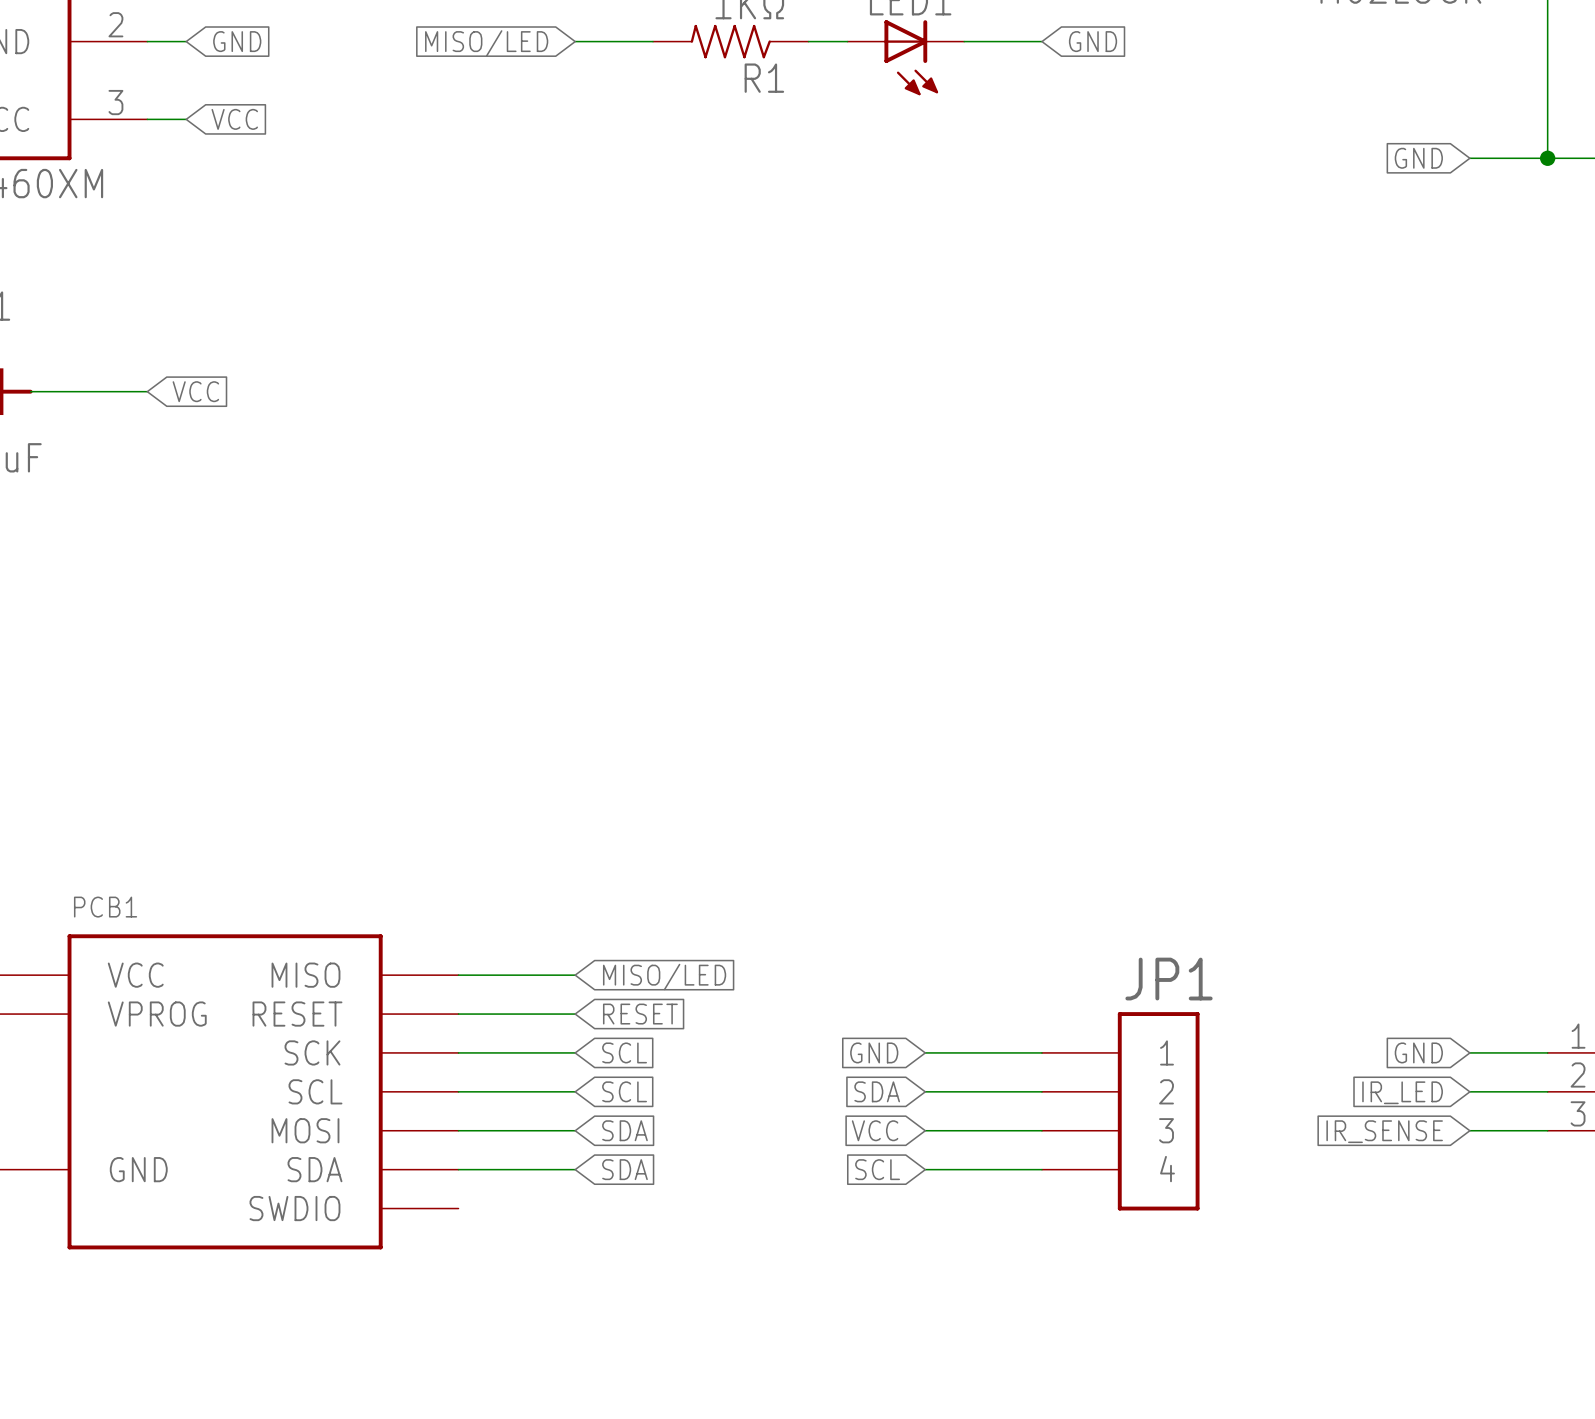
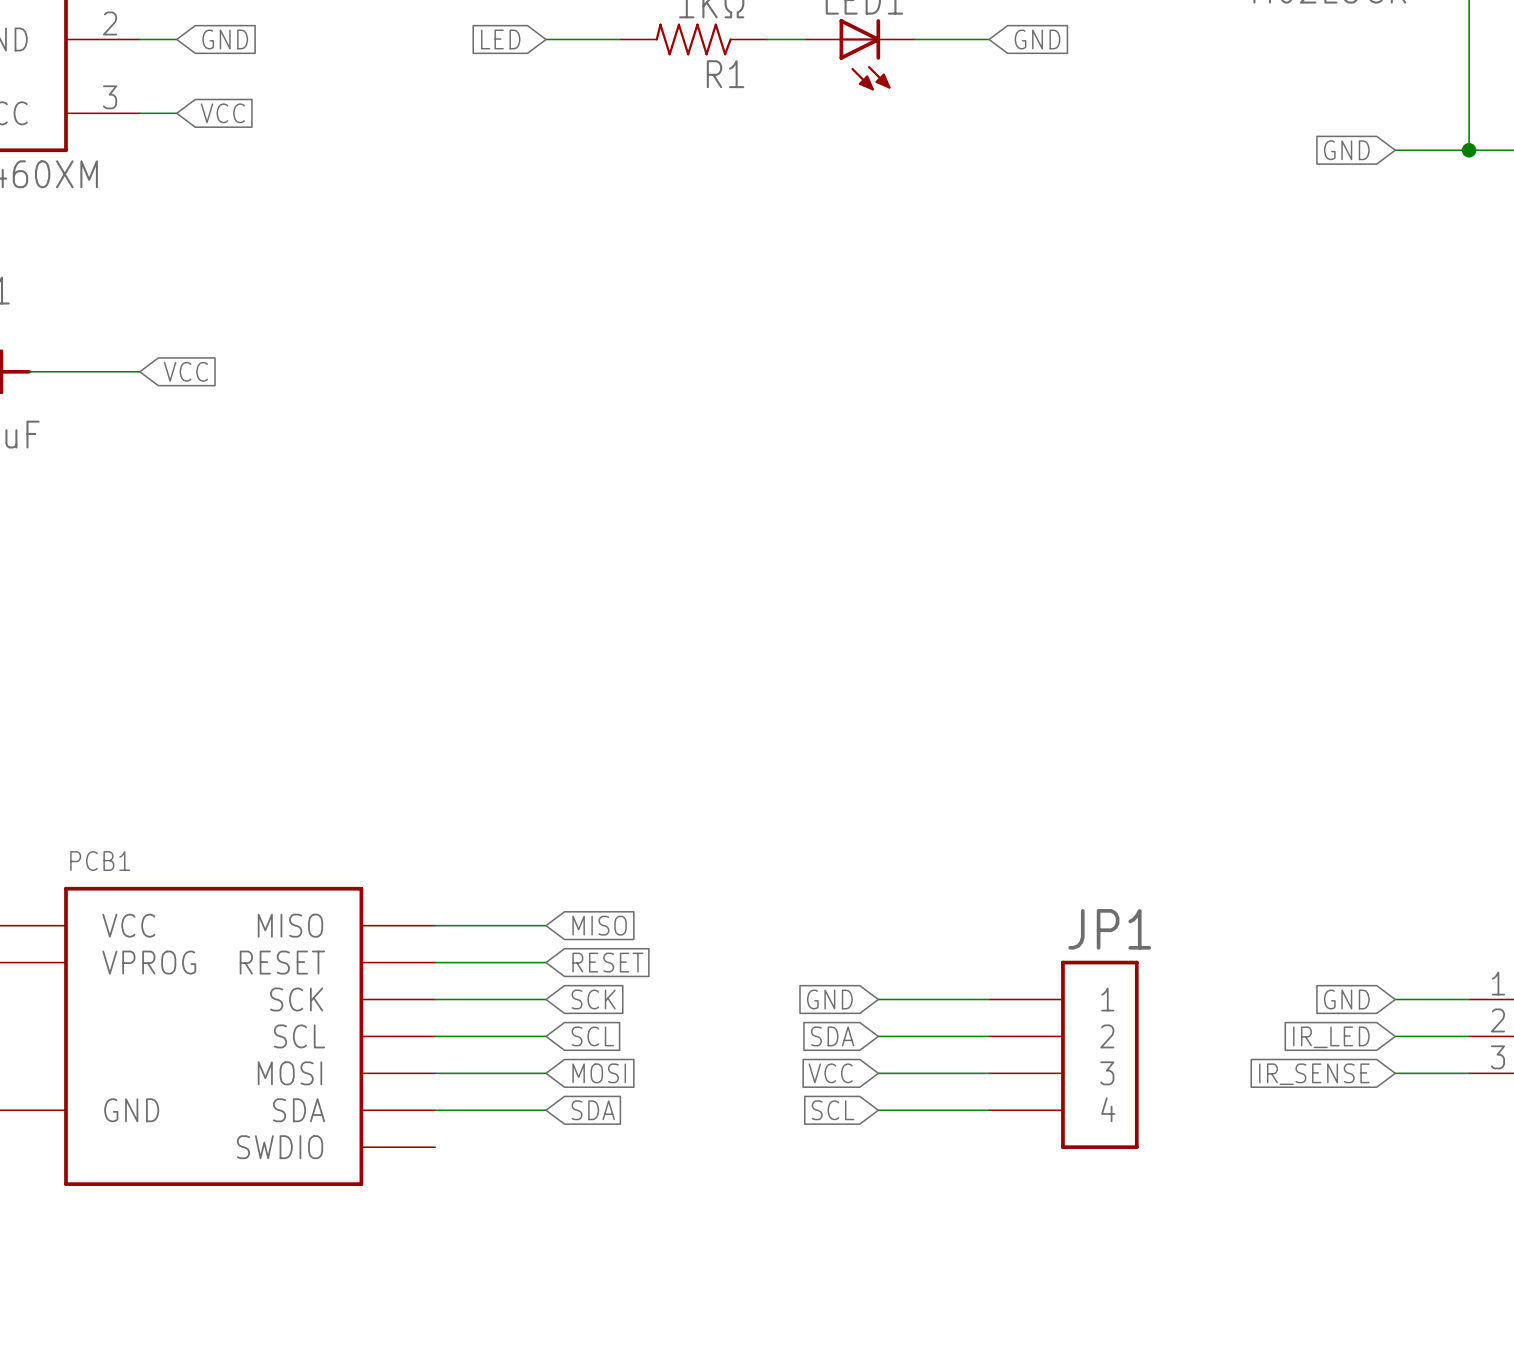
global label: MISO/LED (486, 43) -> LED (500, 39)
global label: MISO/LED (664, 977) -> MISO (599, 925)
global label: SCL (624, 1052) -> SCK (593, 999)
global label: SDA (624, 1130) -> MOSI (599, 1073)

